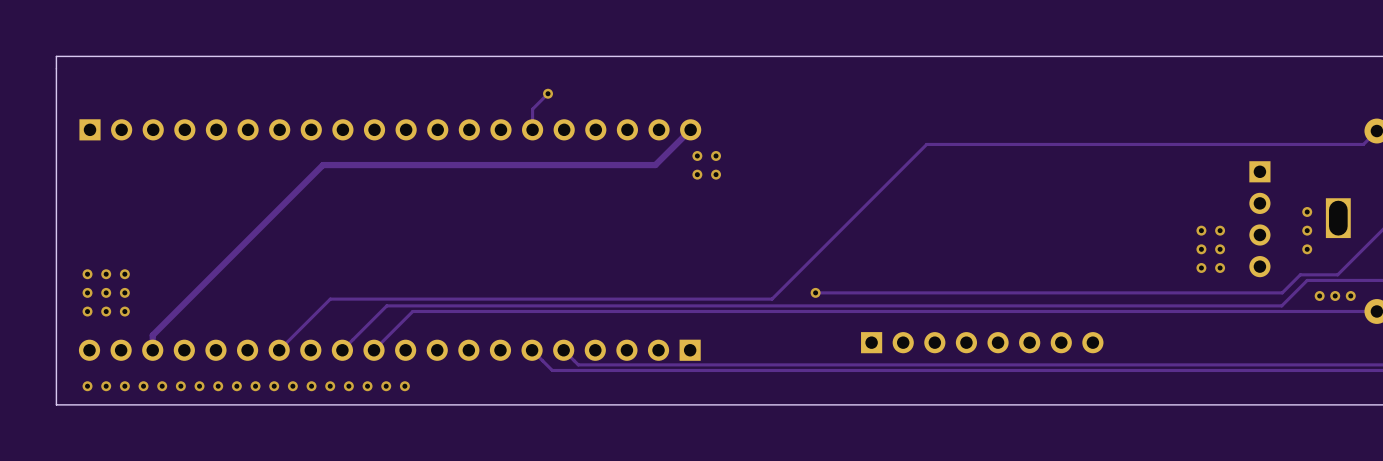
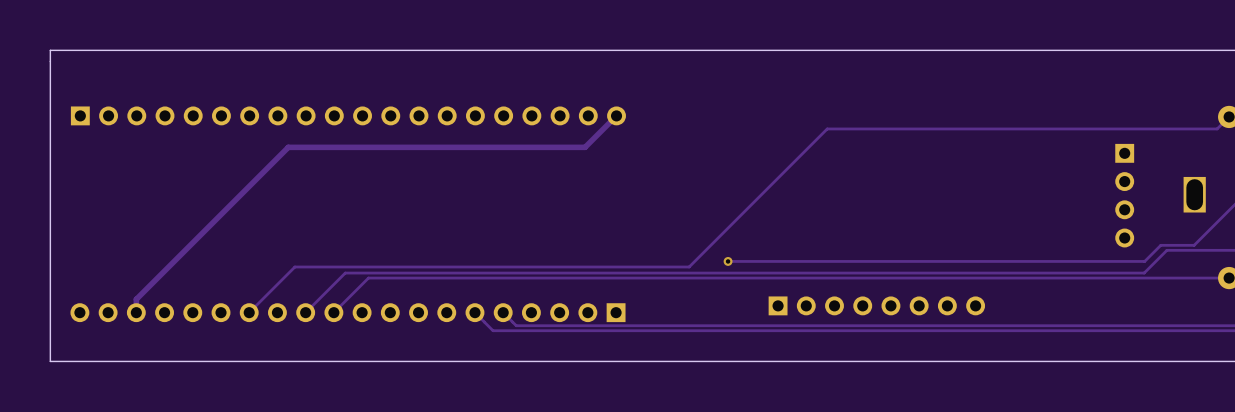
track: (548, 93) (532, 109) (532, 129) -> none
via: (548, 93) -> none
via: (697, 155) -> none
via: (716, 155) -> none
via: (697, 174) -> none
via: (716, 174) -> none
via: (1307, 211) -> none
via: (1201, 230) -> none
via: (1220, 230) -> none
via: (1307, 230) -> none
via: (1201, 249) -> none
via: (1220, 249) -> none
via: (1307, 249) -> none
via: (1201, 267) -> none
via: (1220, 267) -> none
via: (87, 274) -> none
via: (106, 274) -> none
via: (124, 274) -> none
via: (87, 292) -> none
via: (106, 292) -> none
via: (124, 292) -> none
via: (1319, 295) -> none
via: (1335, 295) -> none
via: (1350, 295) -> none
via: (87, 311) -> none
via: (106, 311) -> none
via: (124, 311) -> none
via: (87, 386) -> none
via: (106, 386) -> none
via: (124, 386) -> none
via: (143, 386) -> none
via: (162, 386) -> none
via: (180, 386) -> none
via: (199, 386) -> none
via: (218, 386) -> none
via: (236, 386) -> none
via: (255, 386) -> none
via: (274, 386) -> none
via: (292, 386) -> none
via: (311, 386) -> none
via: (330, 386) -> none
via: (348, 386) -> none
via: (367, 386) -> none
via: (386, 386) -> none
via: (404, 386) -> none

